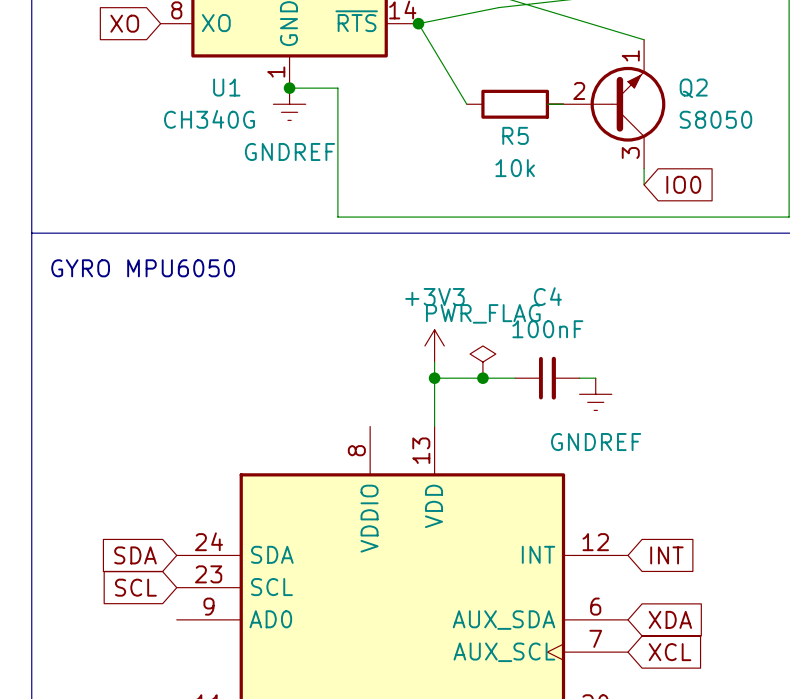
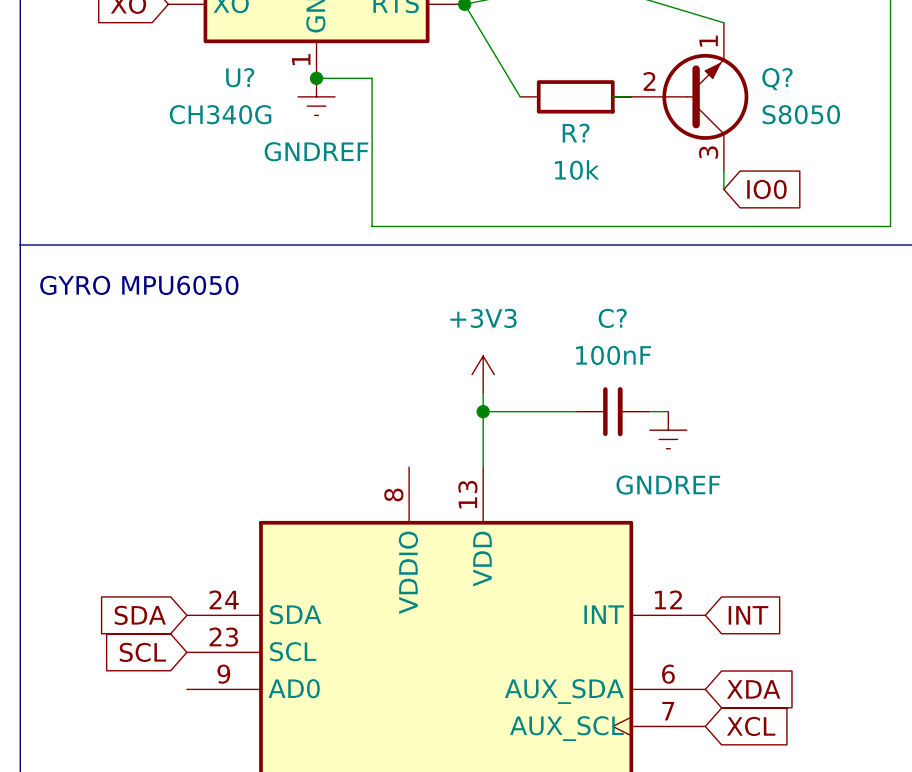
U1 name: U1 (226, 87) -> U? (240, 77)
Q2 name: Q2 (693, 88) -> Q? (777, 79)
R5 name: R5 (515, 135) -> R? (576, 133)
C4 name: C4 (547, 296) -> C? (612, 318)
power symbol: PWR_FLAG (482, 362) -> none
junction: (482, 378) -> none

